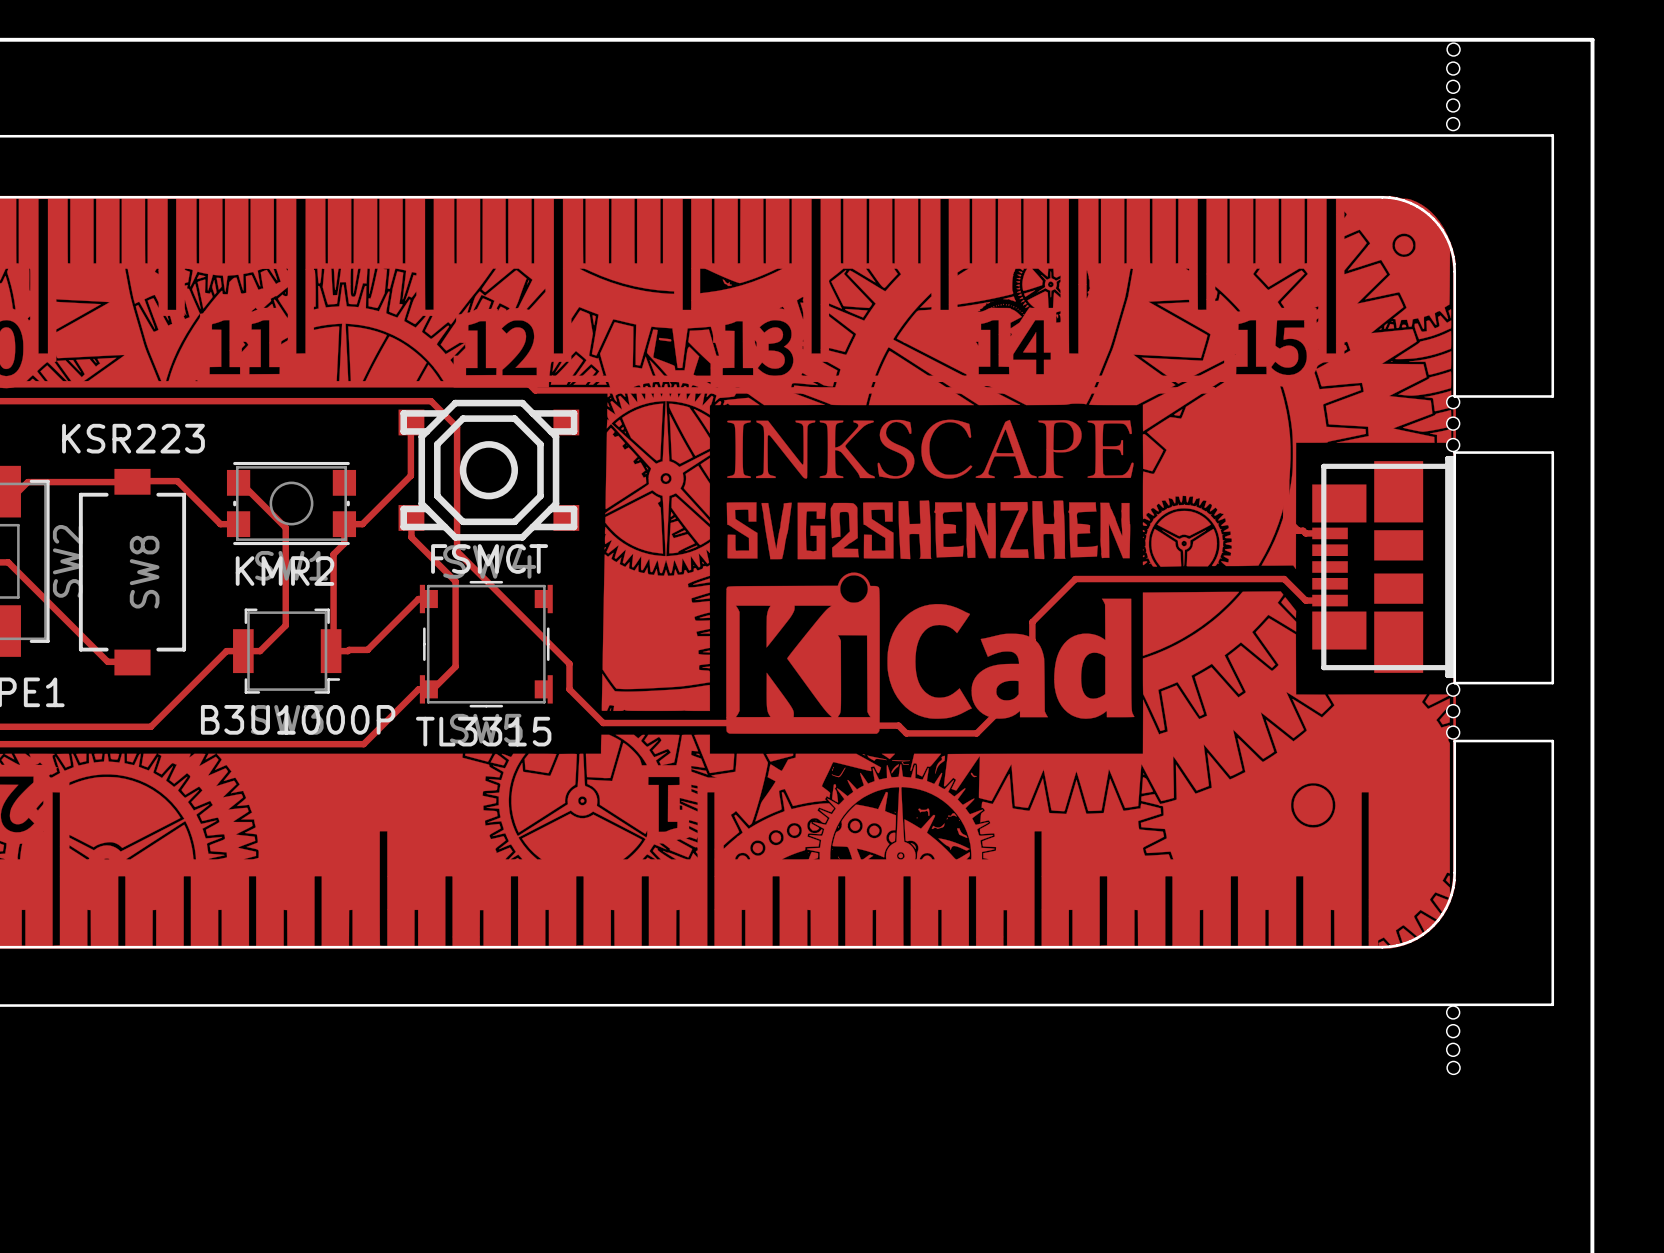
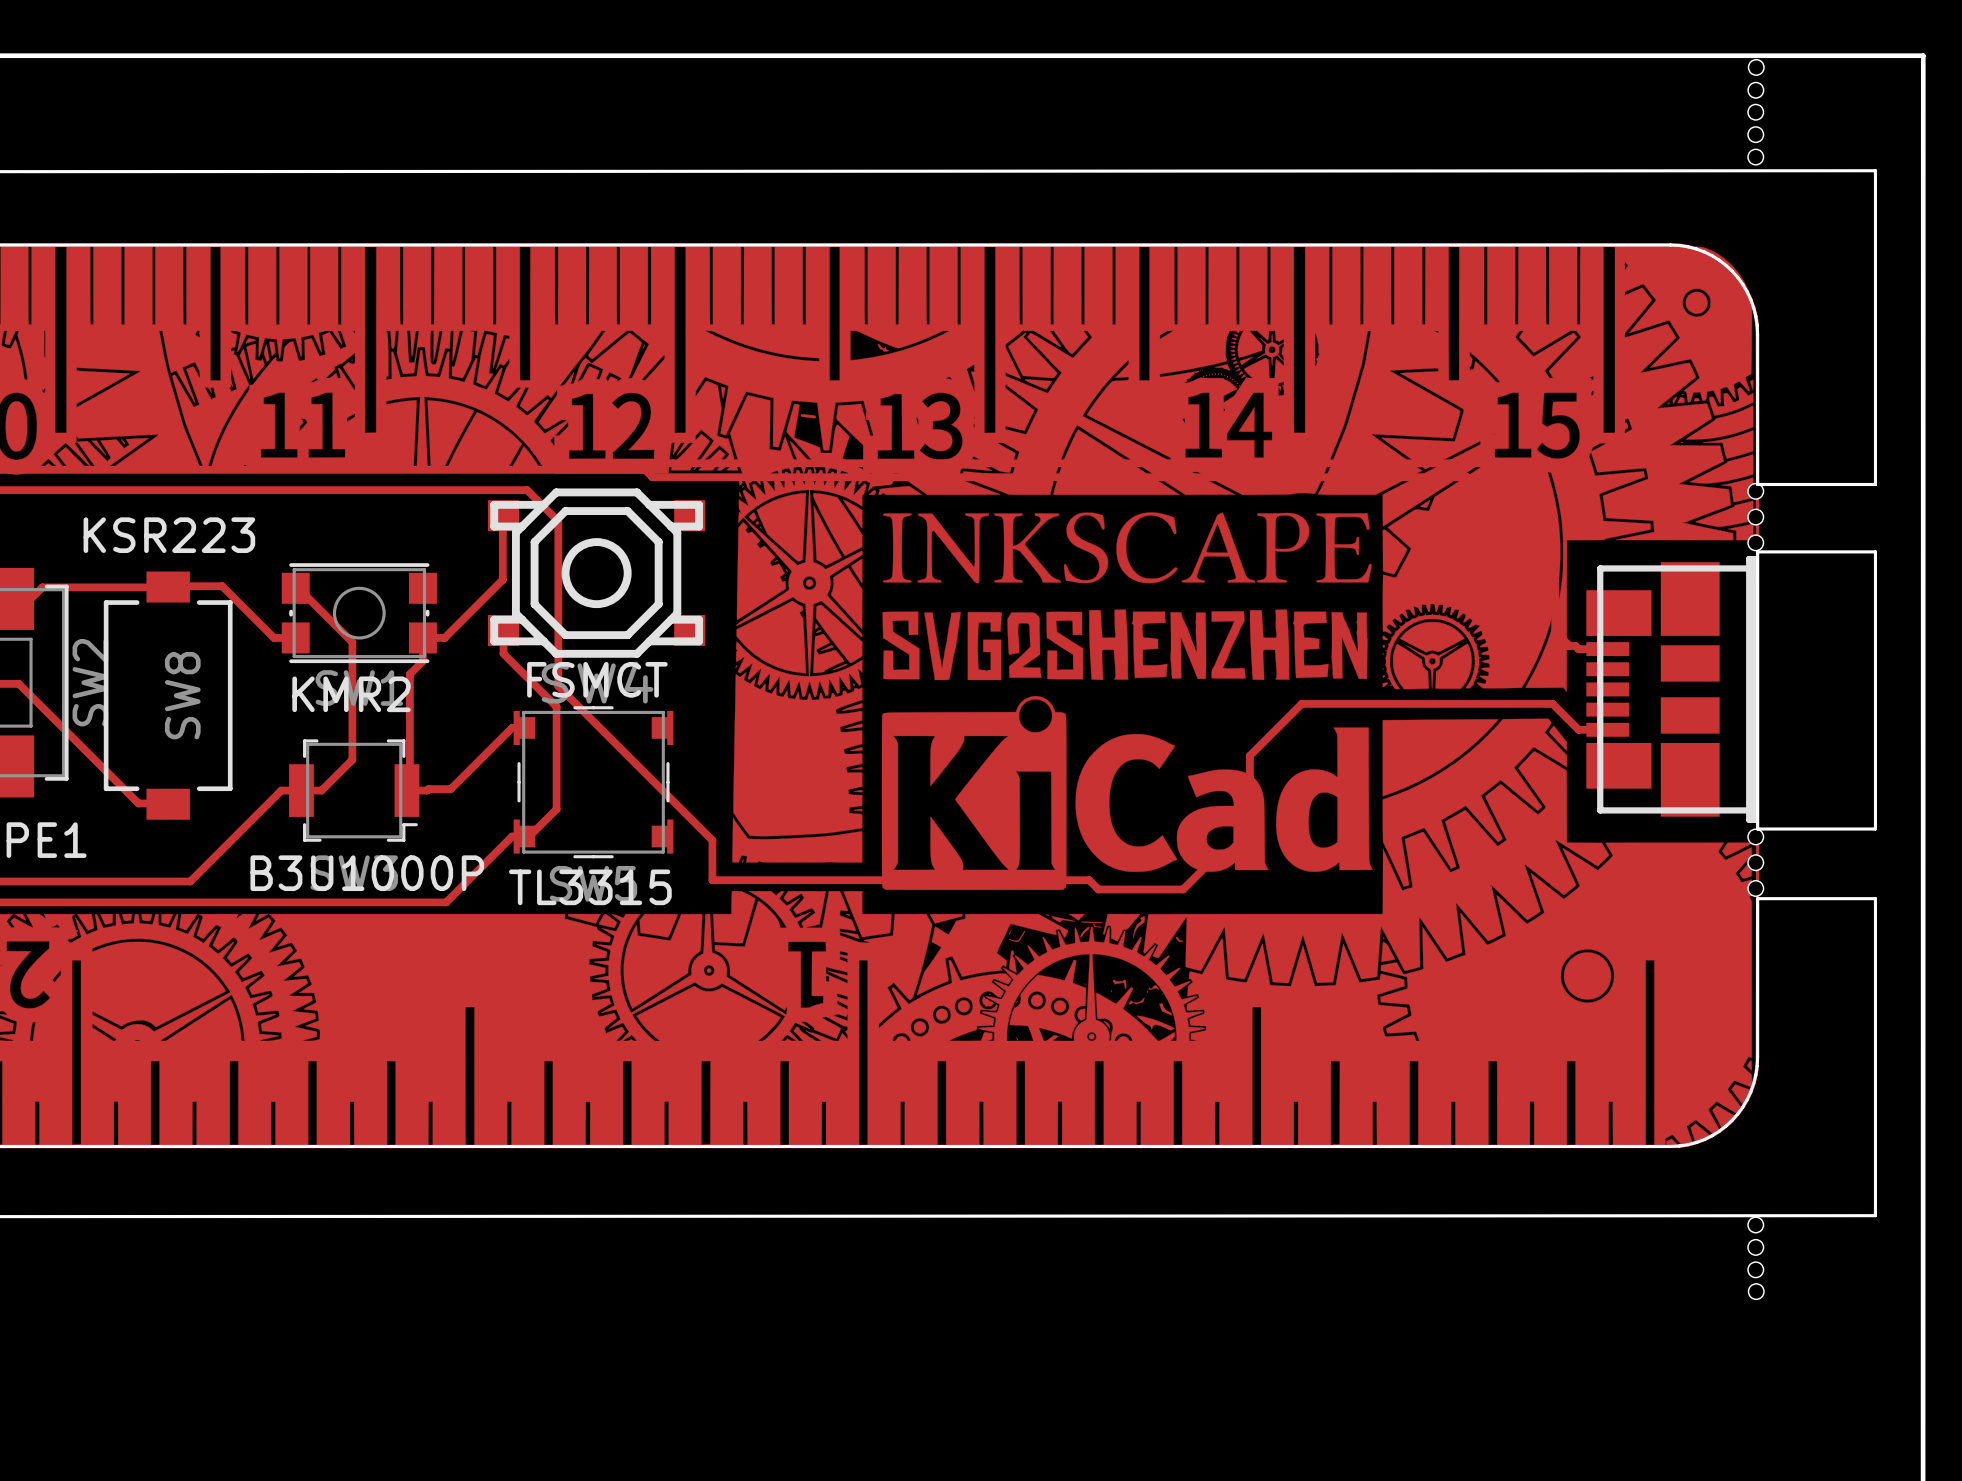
track: (457, 551) (569, 663) (569, 689) (603, 723) (743, 723) -> (558, 670) (558, 686) (712, 840) (712, 880) (905, 880)

